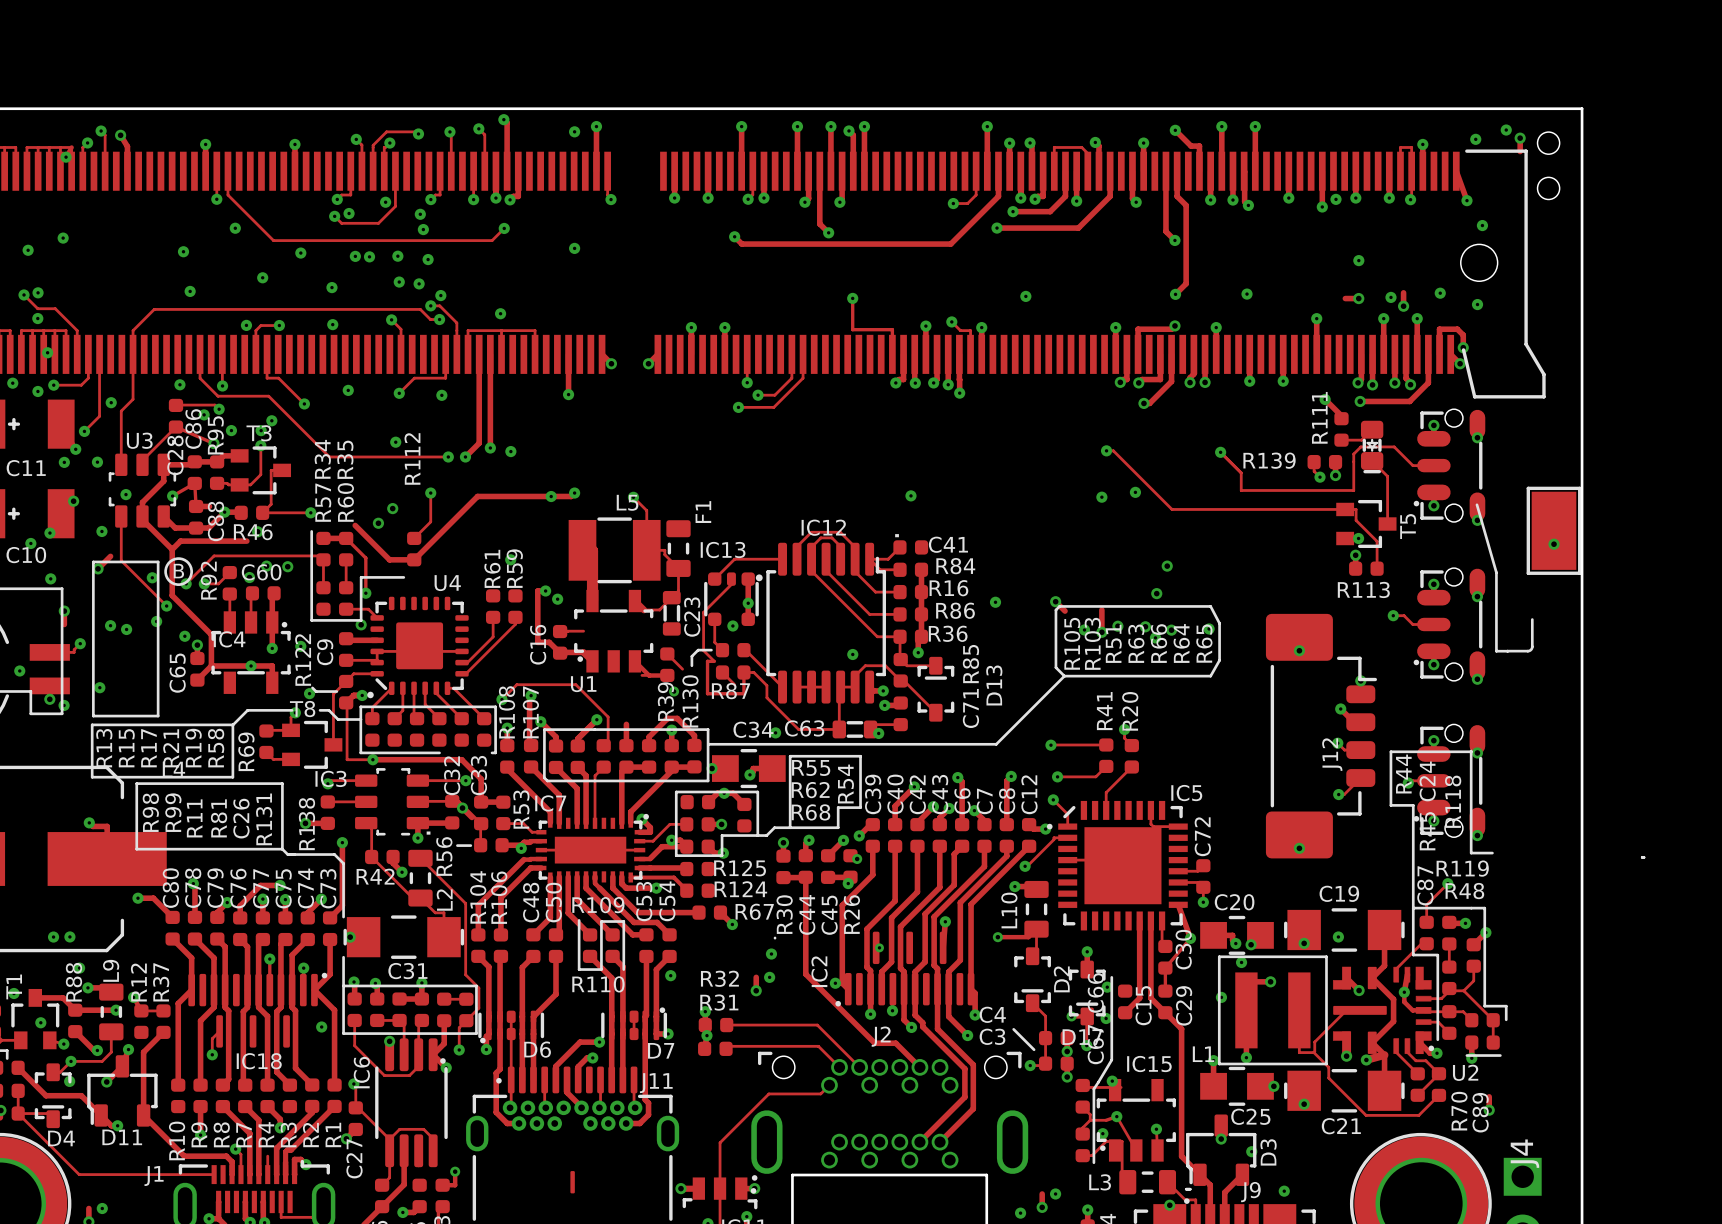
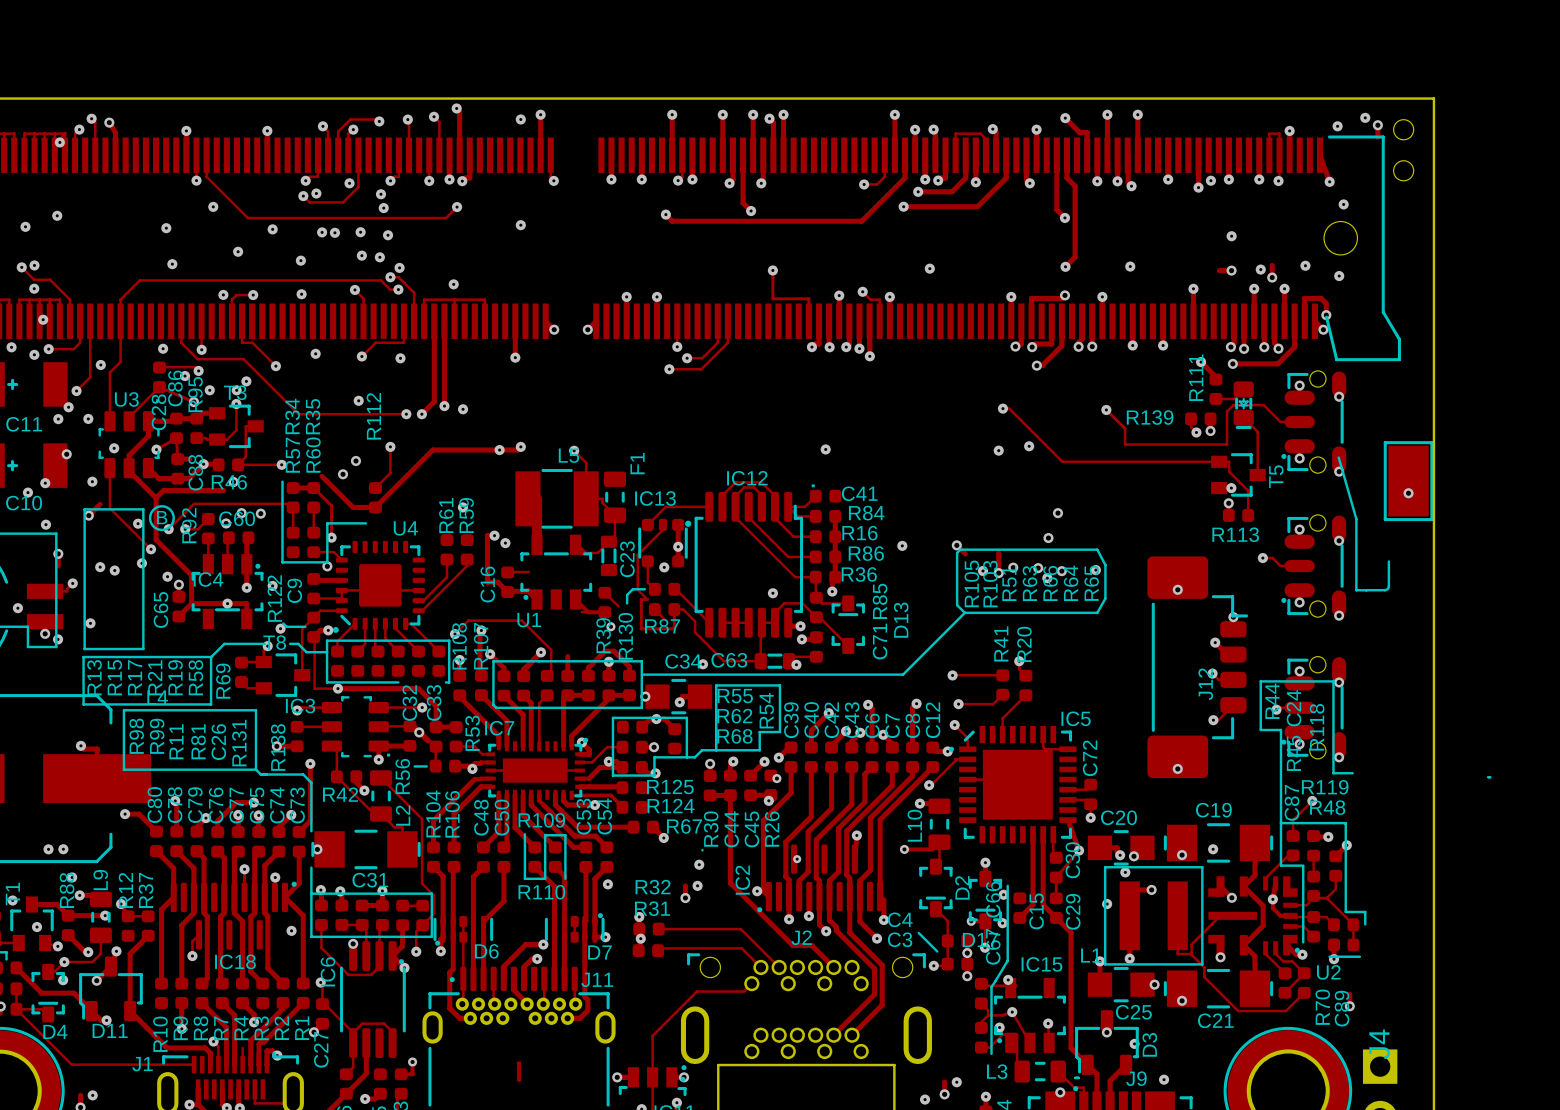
track: (1384, 1055) (1366, 1059) -> none
via: (1366, 1059) -> none

